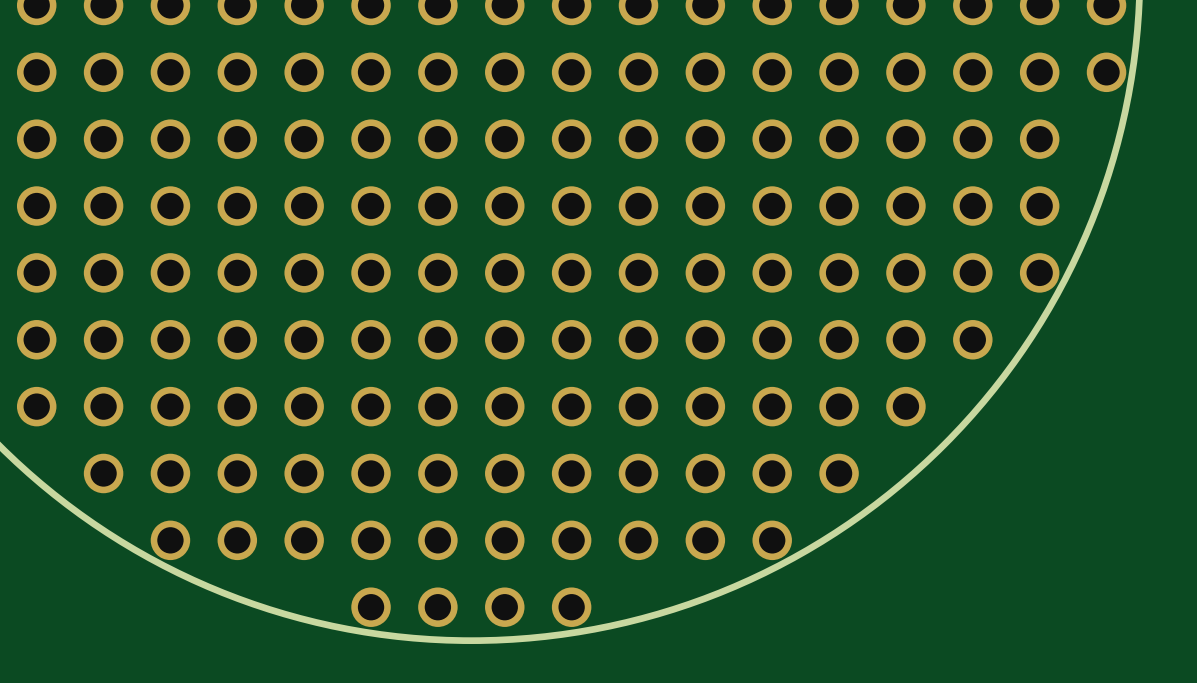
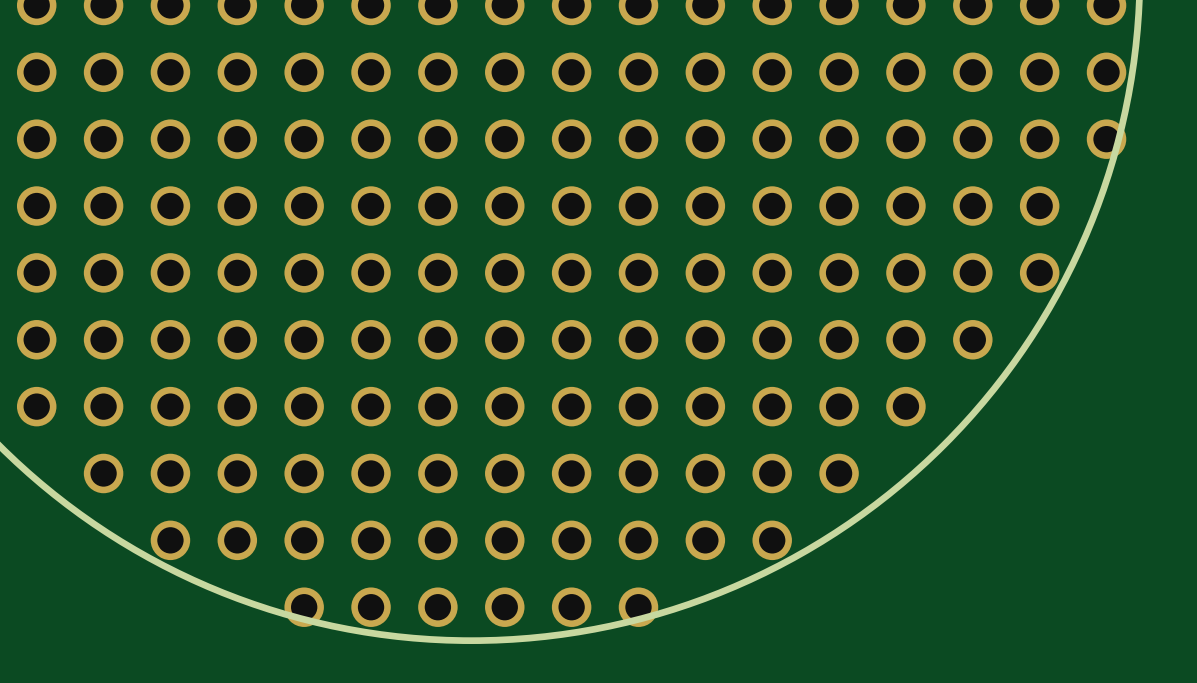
via: none -> (1106, 139)
via: none -> (304, 607)
via: none -> (638, 607)

